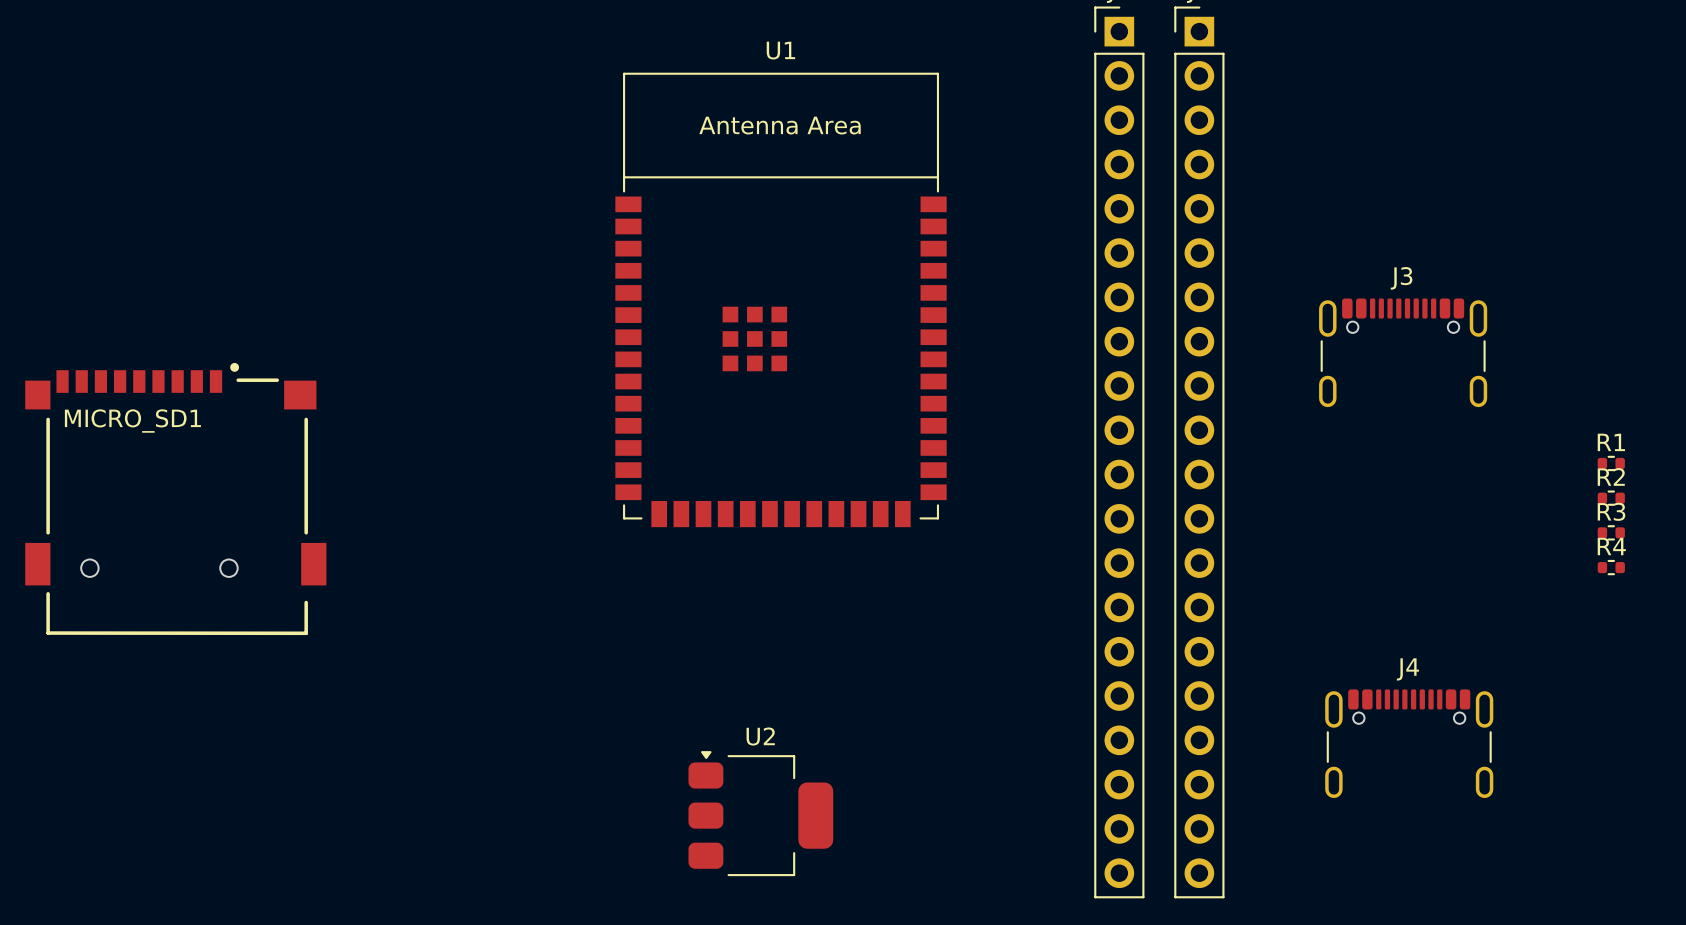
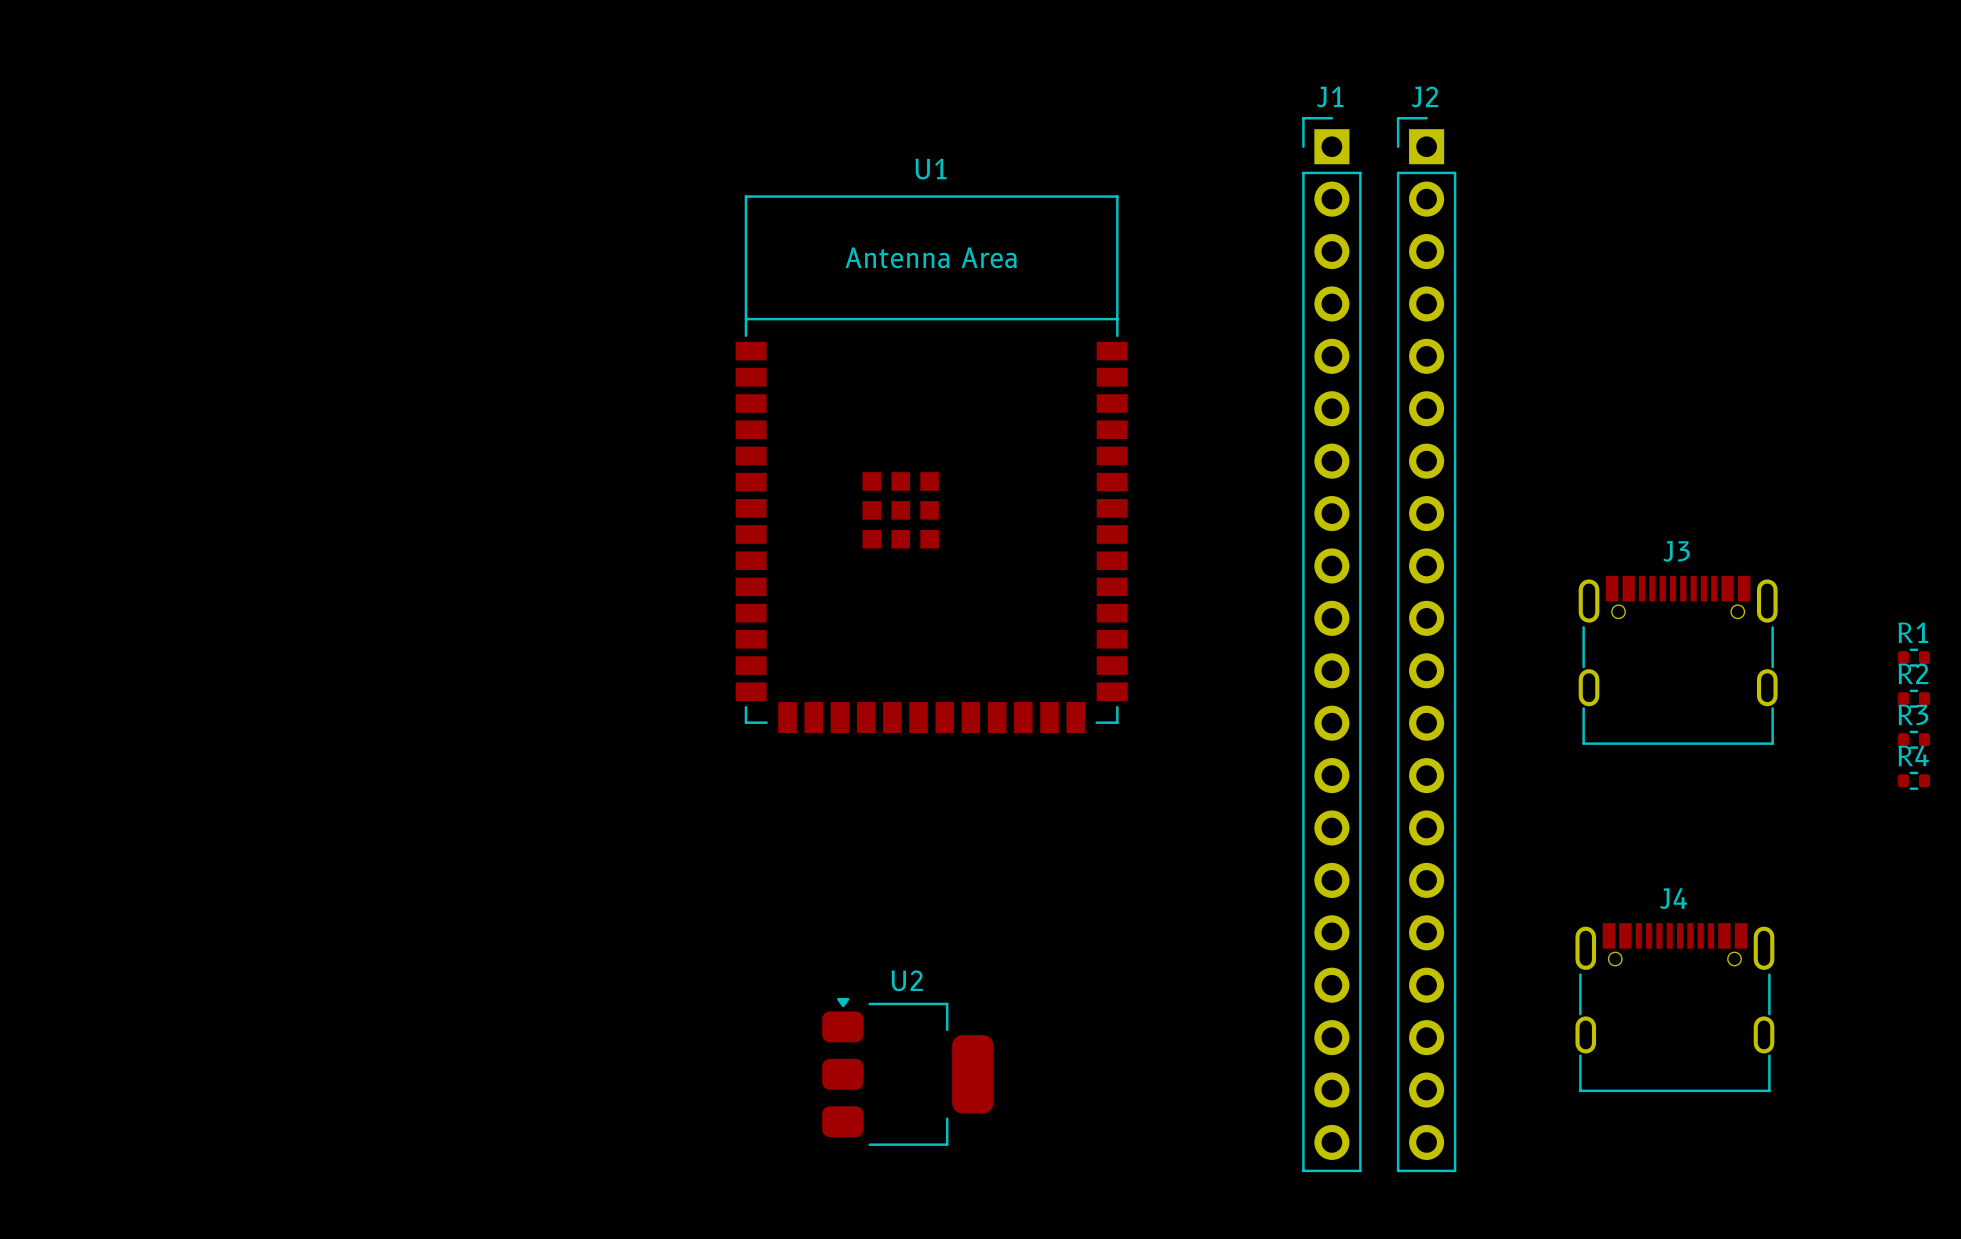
J3 footprint: [1319, 298, 1488, 408] -> [1578, 575, 1778, 745]
MICRO_SD1: (175, 499) -> none
J4 footprint: [1325, 689, 1494, 799] -> [1575, 923, 1775, 1093]

